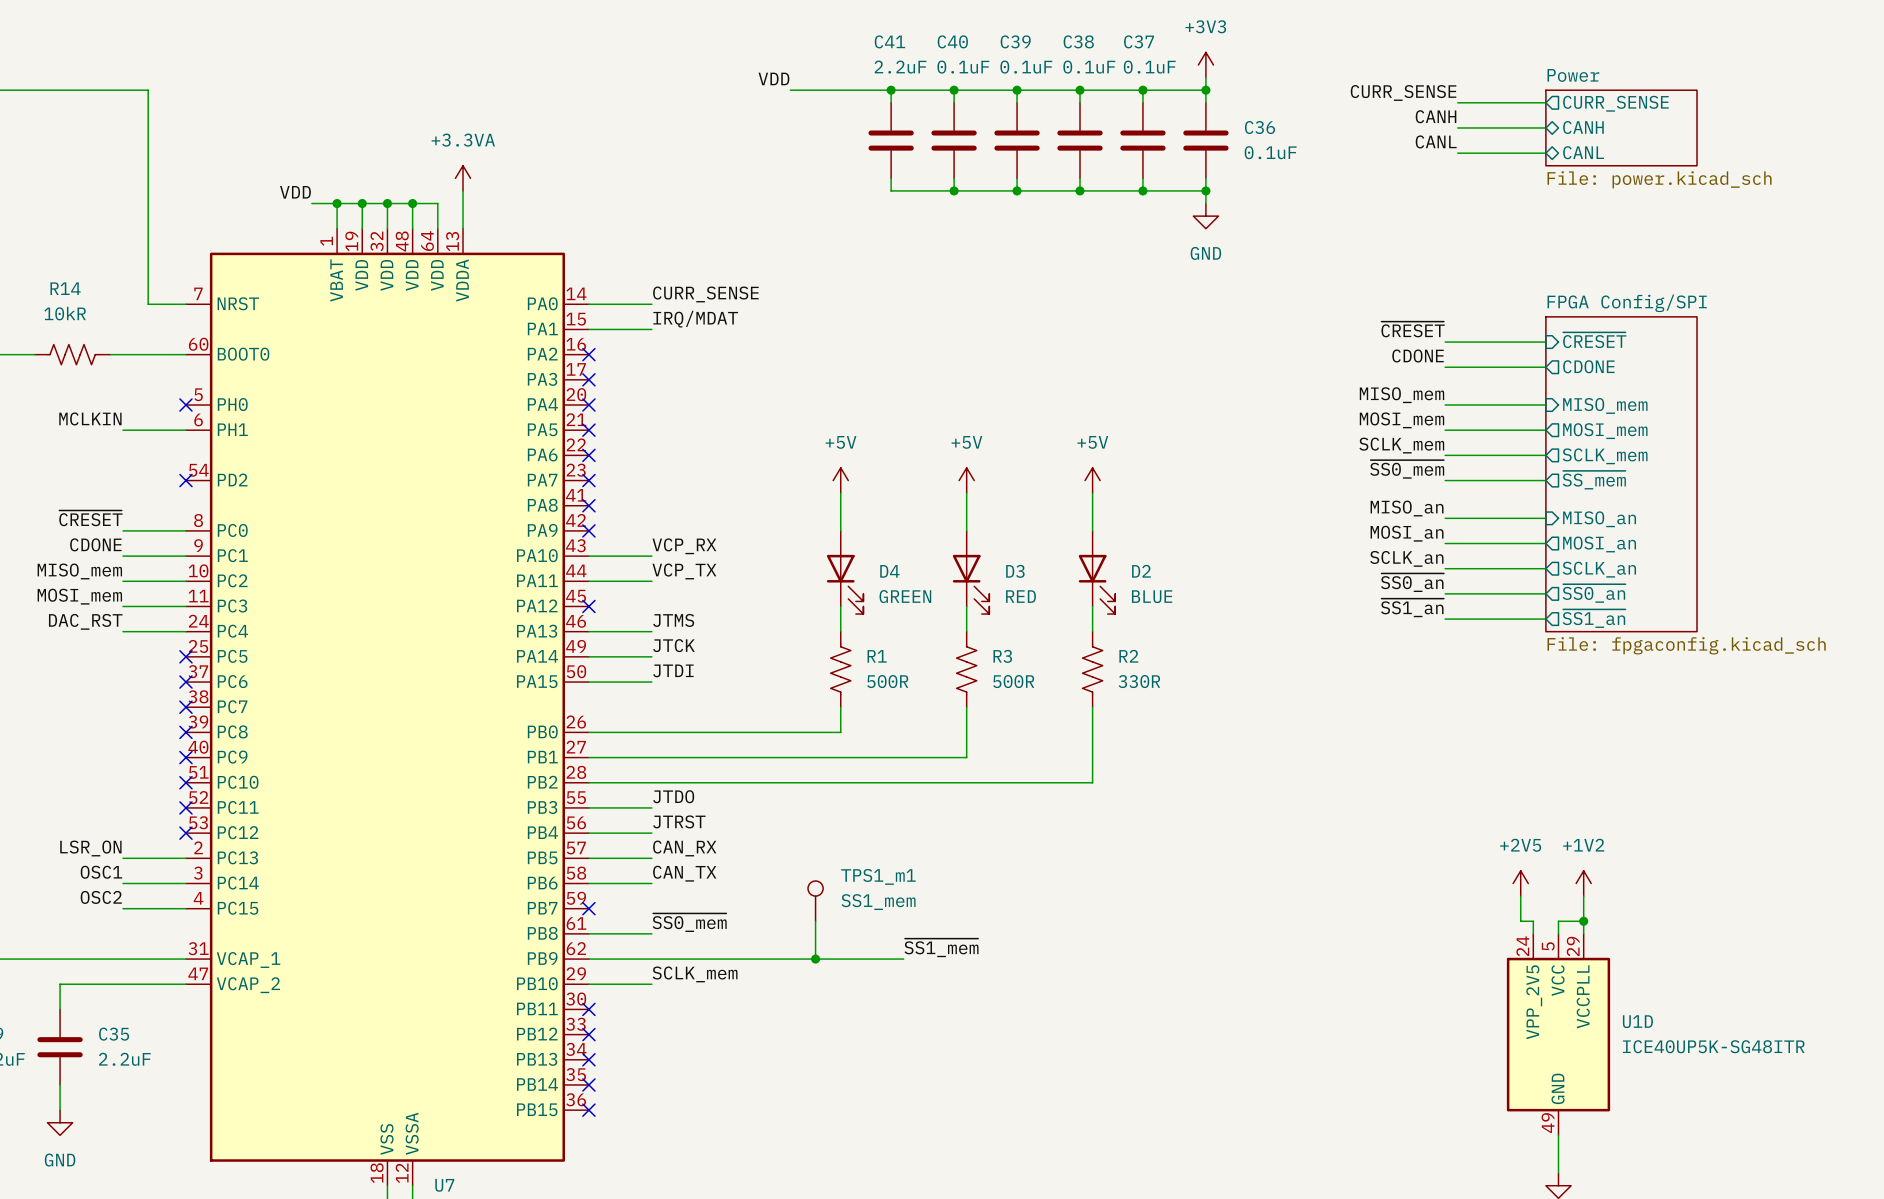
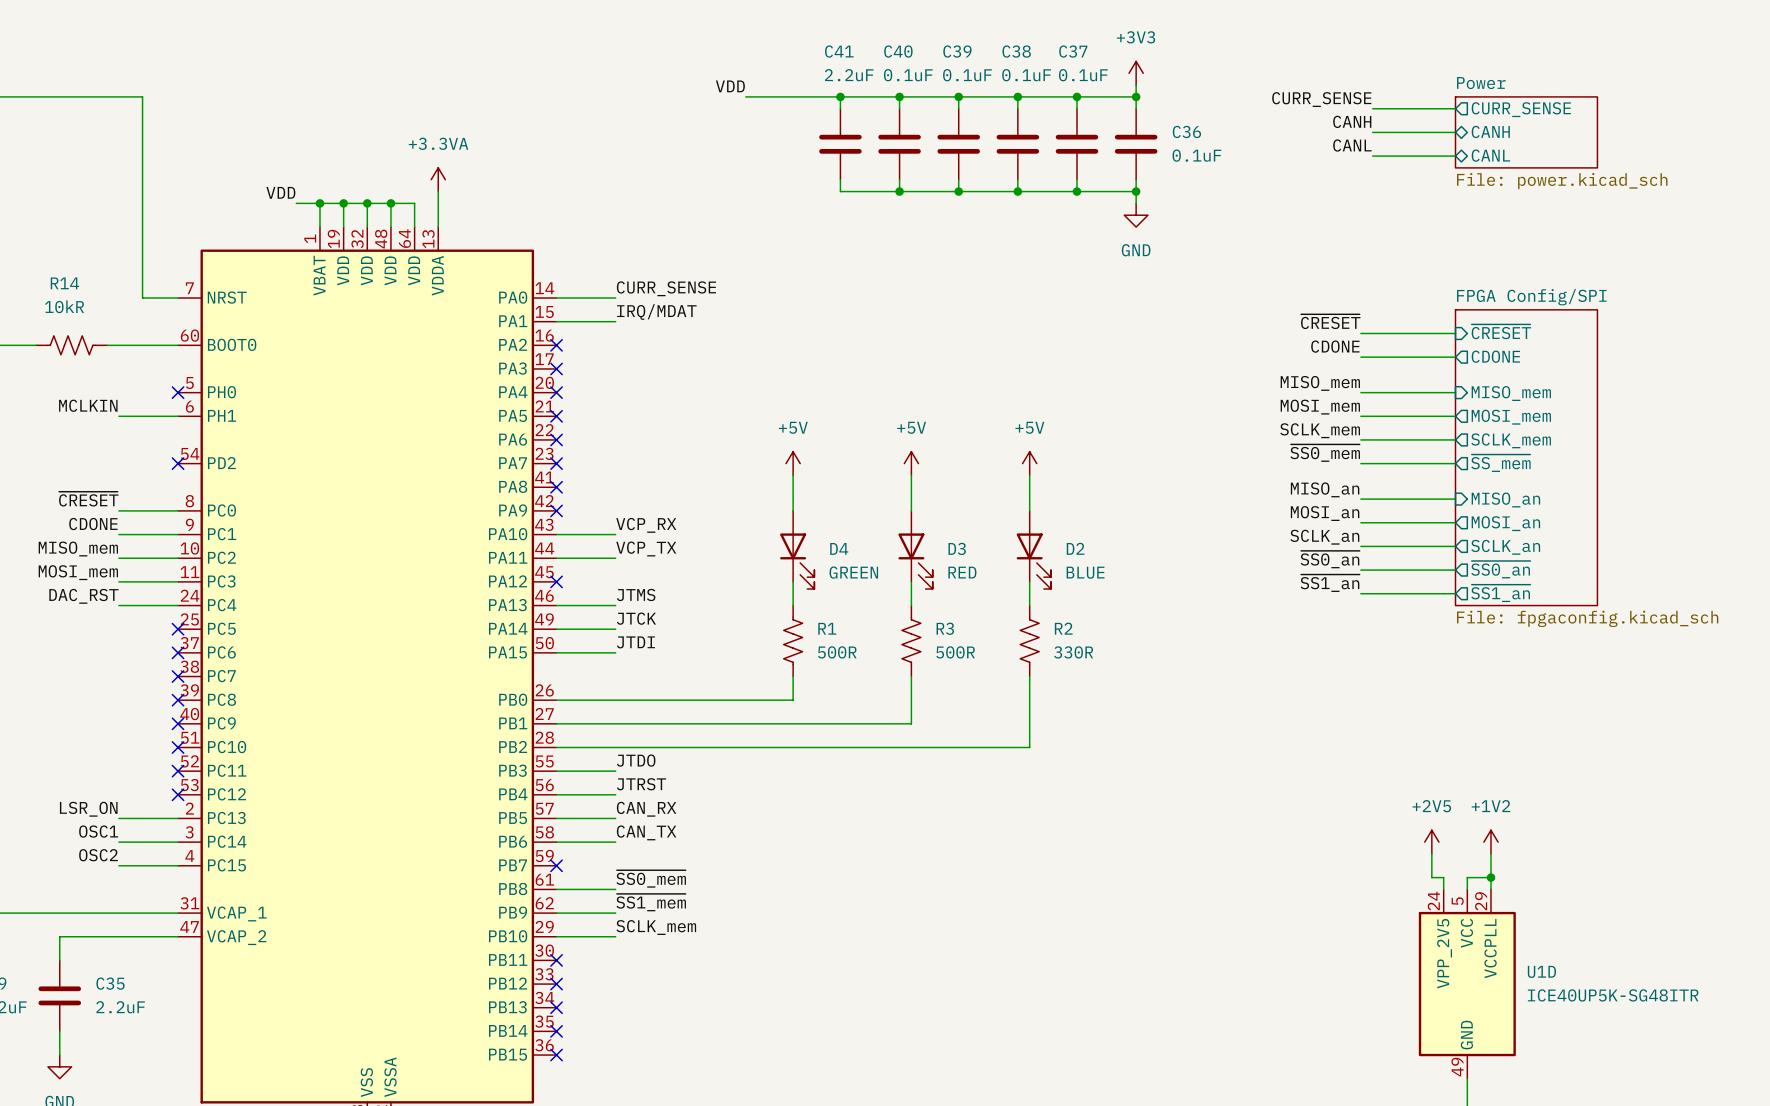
TPS1_m1: SS1_mem (815, 901) -> none
wire: (815, 921) (815, 959) -> none
label: none -> ~{SS1_mem} (651, 902)
label: ~{SS1_mem} (941, 947) -> none
wire: (651, 959) (903, 959) -> none
junction: (815, 959) -> none

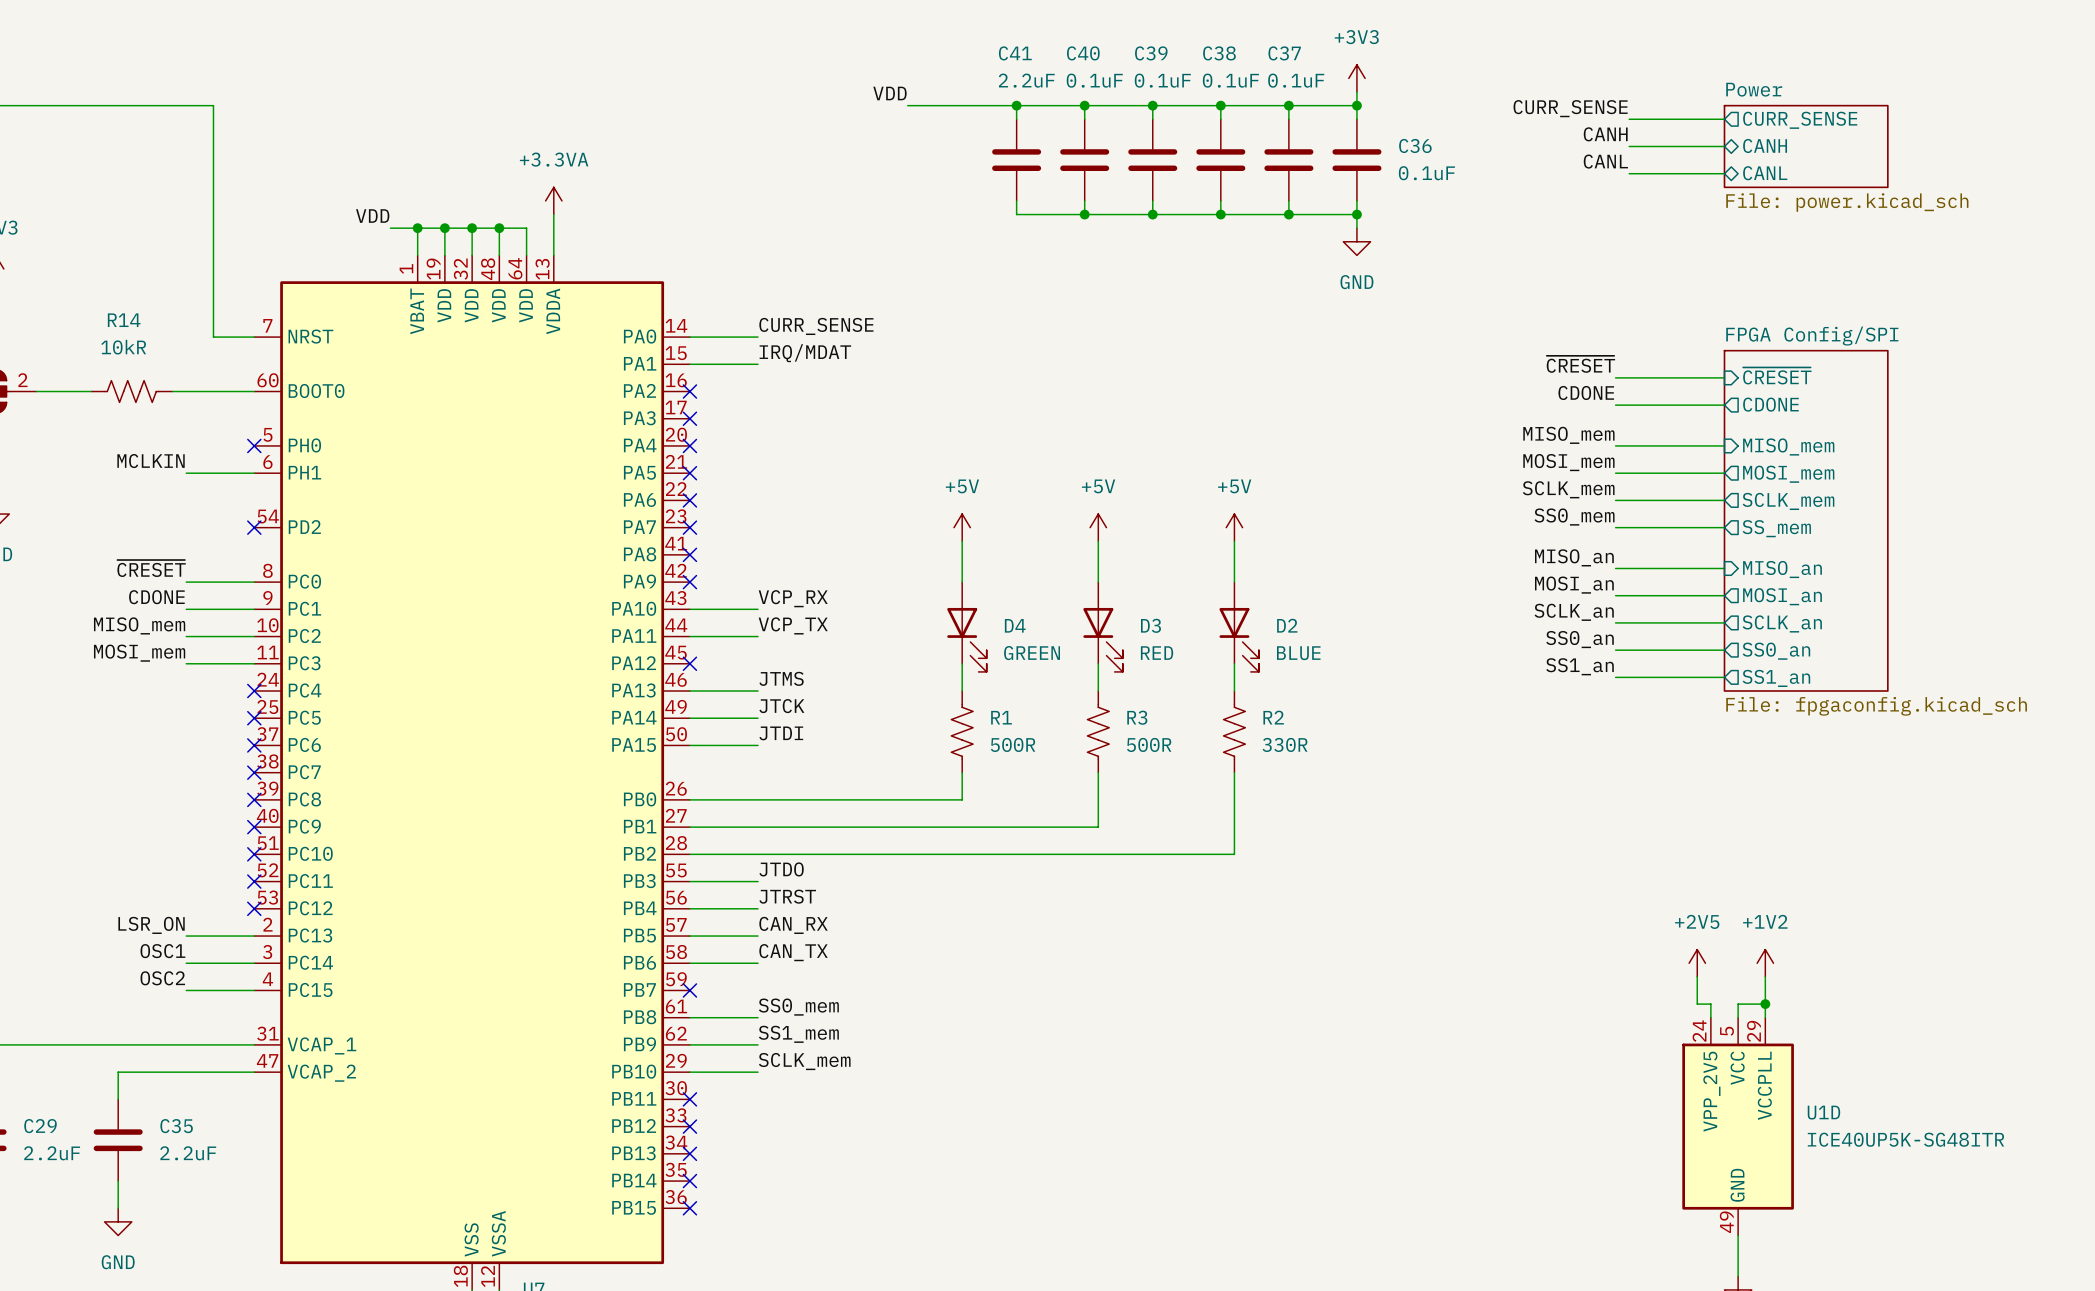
label: ~{SS0_mem} (1325, 453) -> SS0_mem (1574, 517)
sheet pin: ~{SS_mem} (1500, 463) -> SS_mem (1776, 528)
label: ~{SS0_an} (1330, 559) -> SS0_an (1580, 639)
sheet pin: ~{SS0_an} (1500, 569) -> SS0_an (1776, 651)
label: ~{SS1_an} (1330, 583) -> SS1_an (1580, 666)
sheet pin: ~{SS1_an} (1500, 593) -> SS1_an (1776, 678)
label: DAC_RST (83, 596) -> none
wire: (118, 605) (178, 605) -> none
no-connect mark: none -> (254, 691)
label: ~{SS0_mem} (651, 878) -> SS0_mem (798, 1007)
label: ~{SS1_mem} (651, 902) -> SS1_mem (798, 1034)

